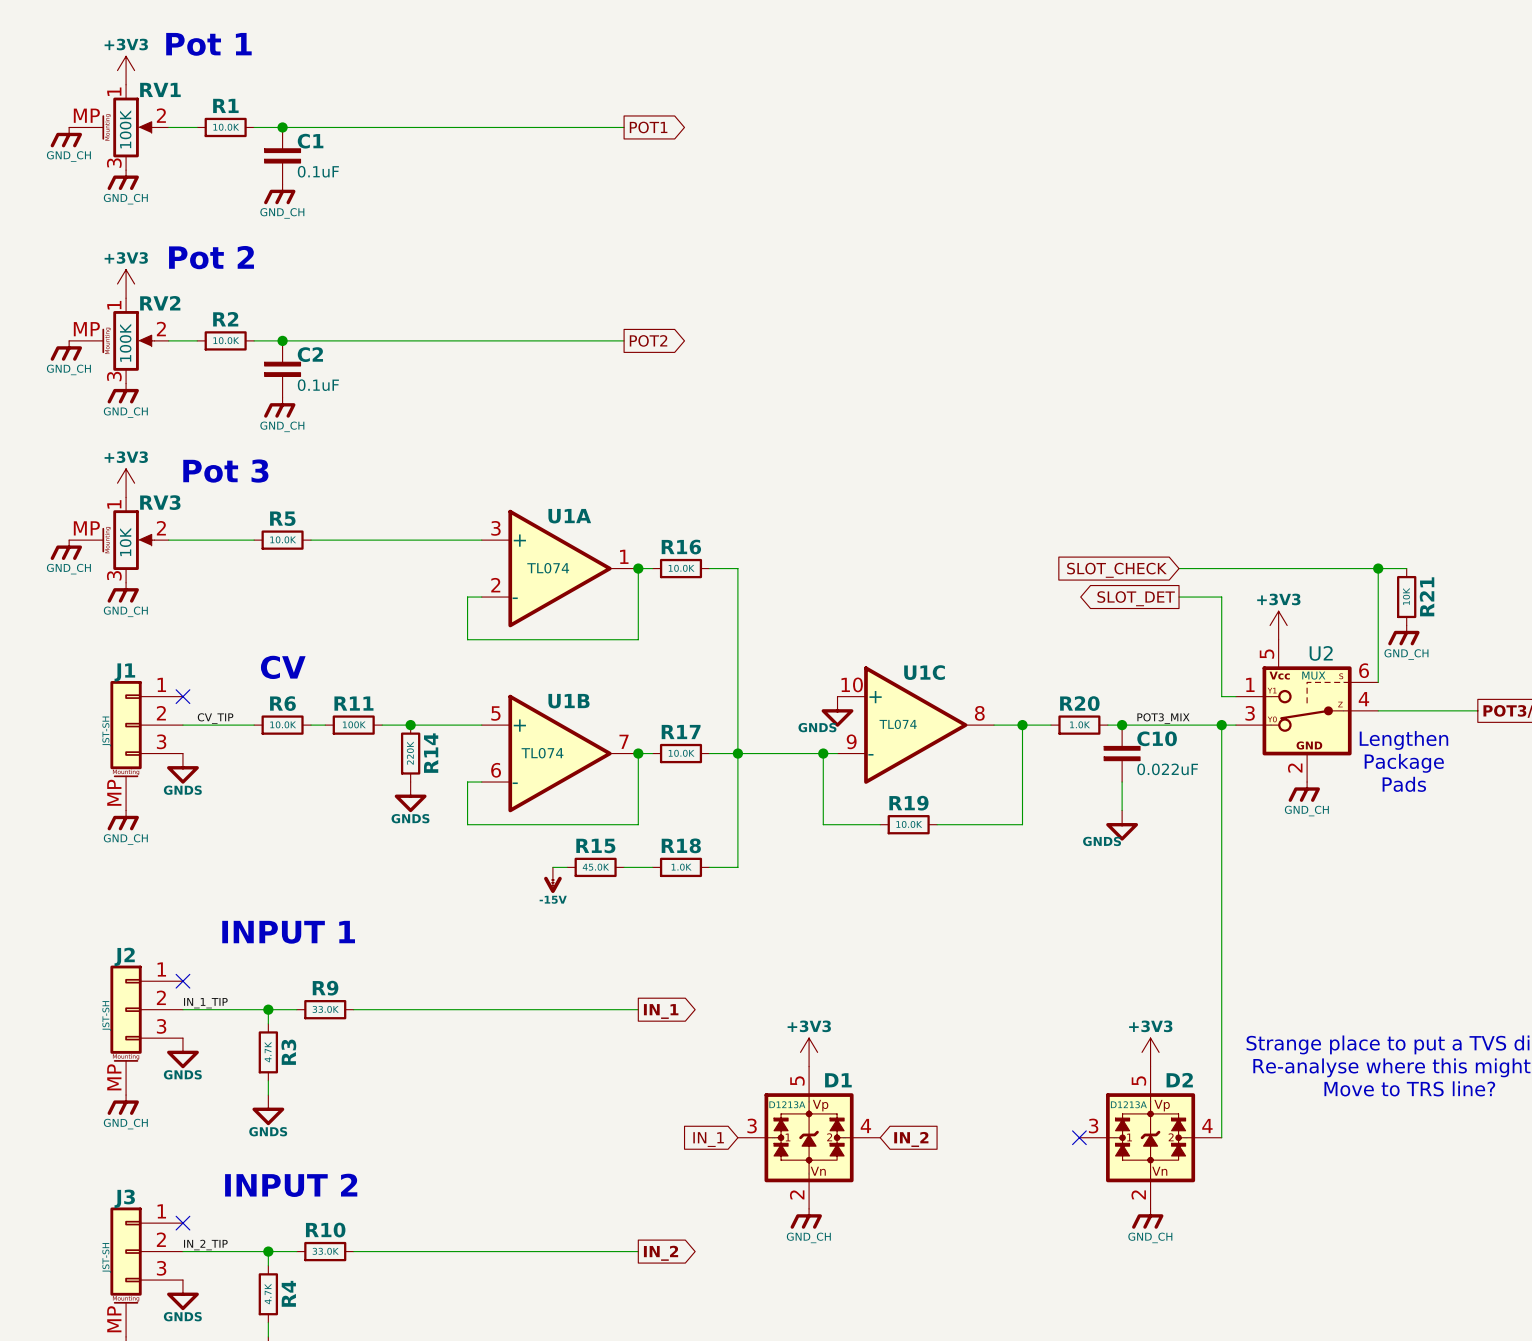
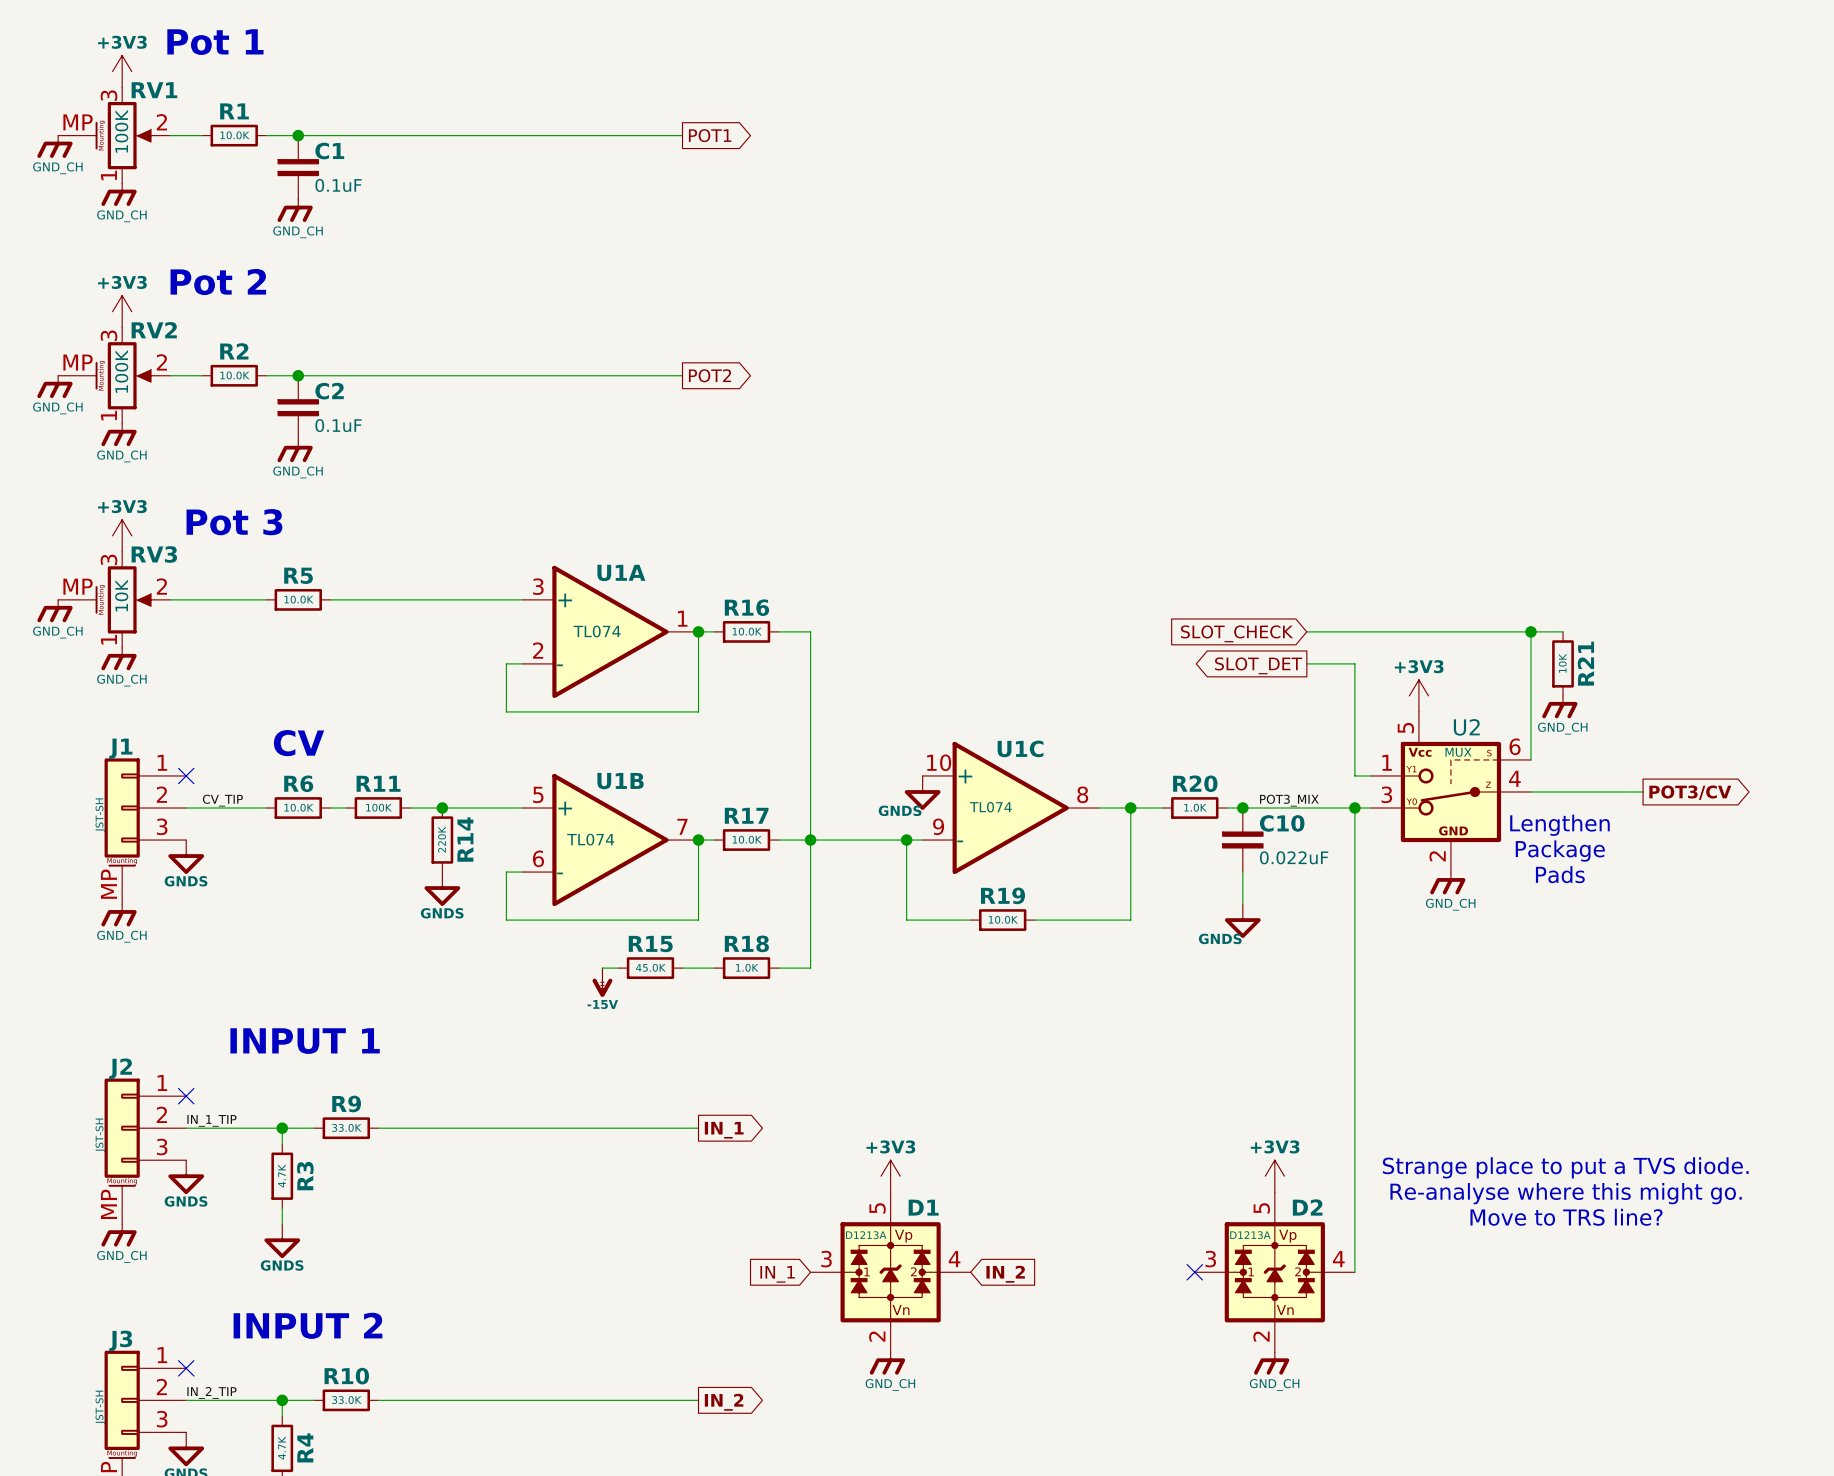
RV1 flip: as is (128, 127) -> up-down (124, 135)
RV2 flip: as is (128, 340) -> up-down (124, 375)
RV3 flip: as is (128, 540) -> up-down (124, 599)

